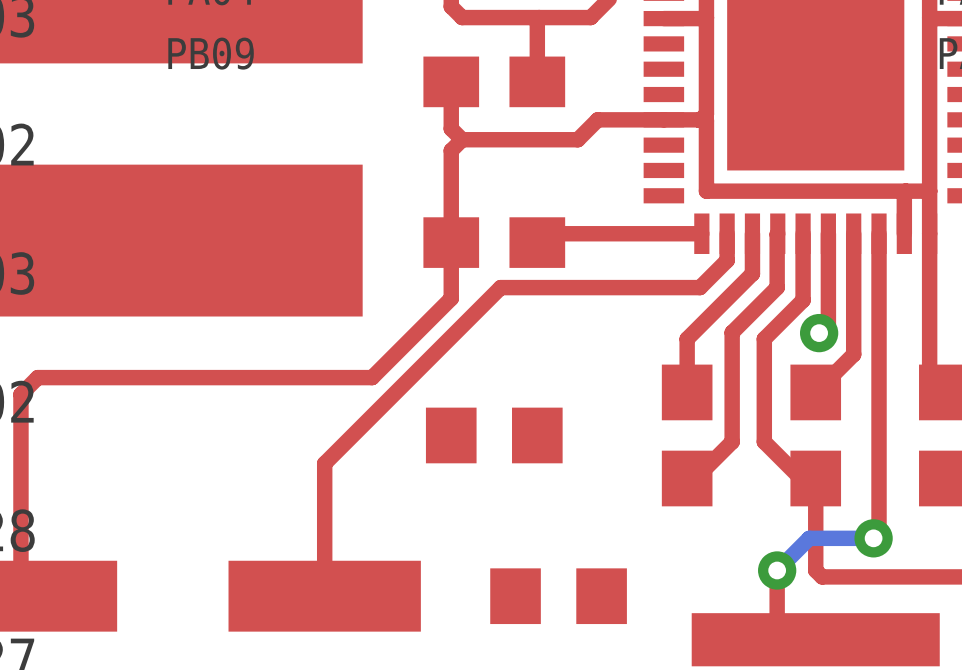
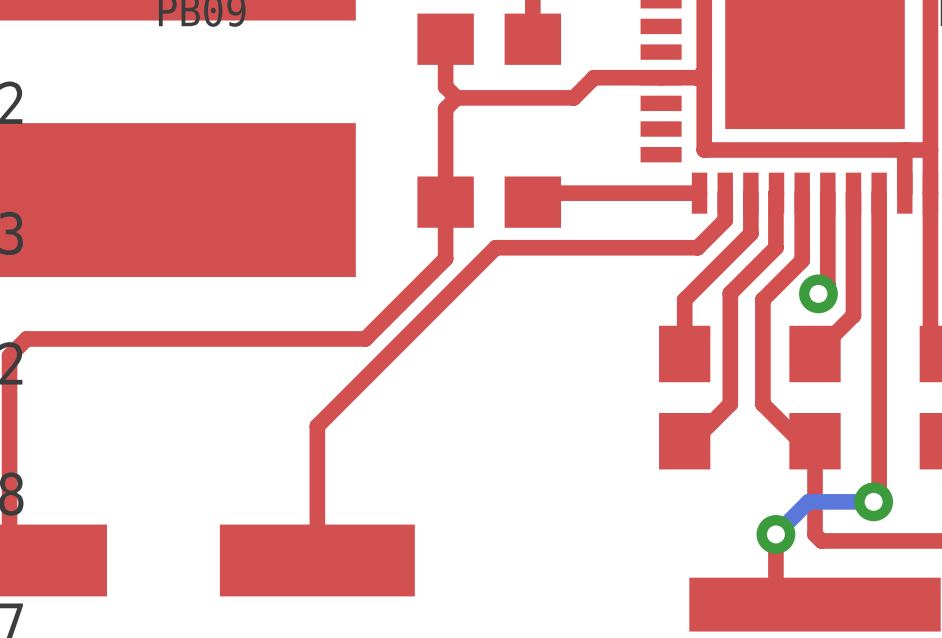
part: (494, 435) -> none
part: (558, 596) -> none

